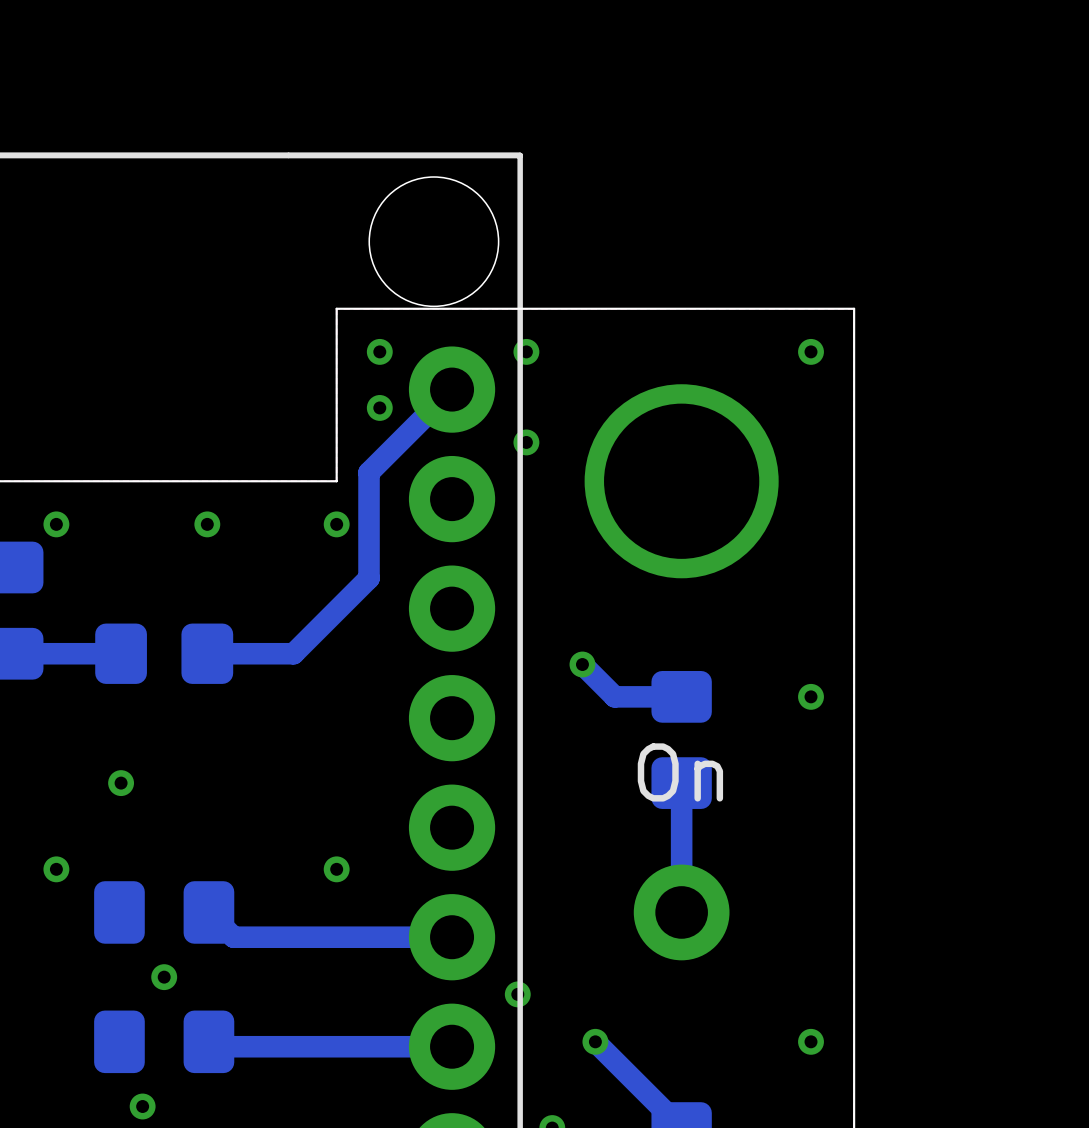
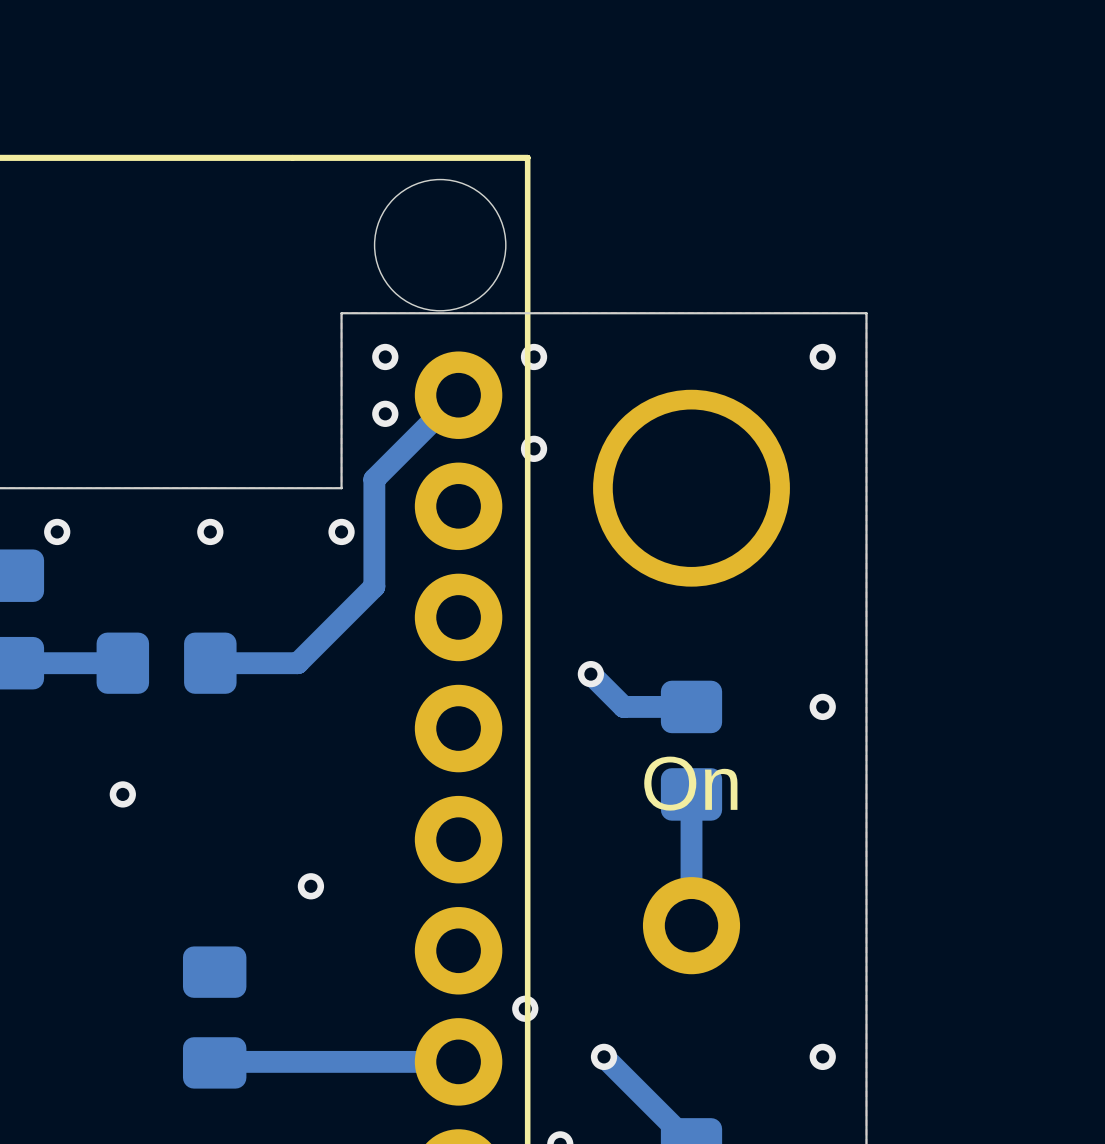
via: (56, 869) -> none
via position: (336, 869) -> (310, 886)
part: (164, 912) -> none
bottom track: (208, 912) (233, 937) (452, 937) -> none
via: (164, 977) -> none
part: none -> (214, 1017)
part: (164, 1041) -> none
via: (142, 1106) -> none

